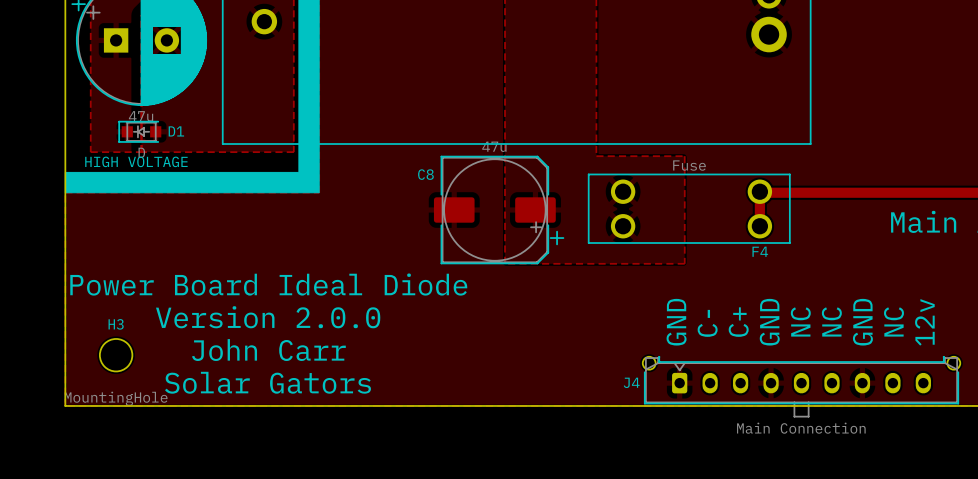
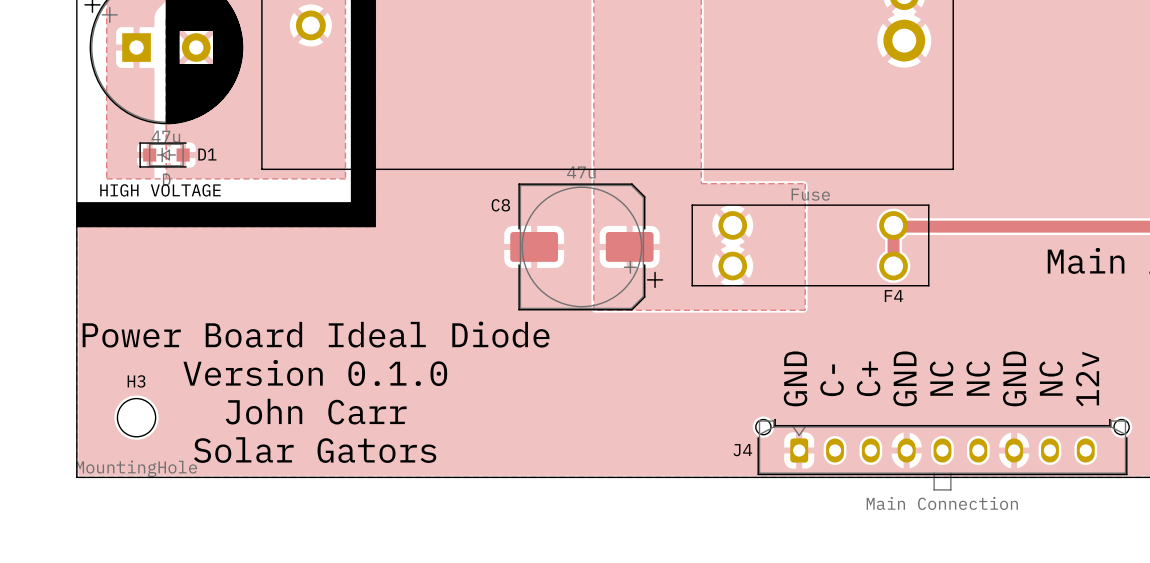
text: Version 2.0.0 (268, 317) -> Version 0.1.0 (315, 373)

